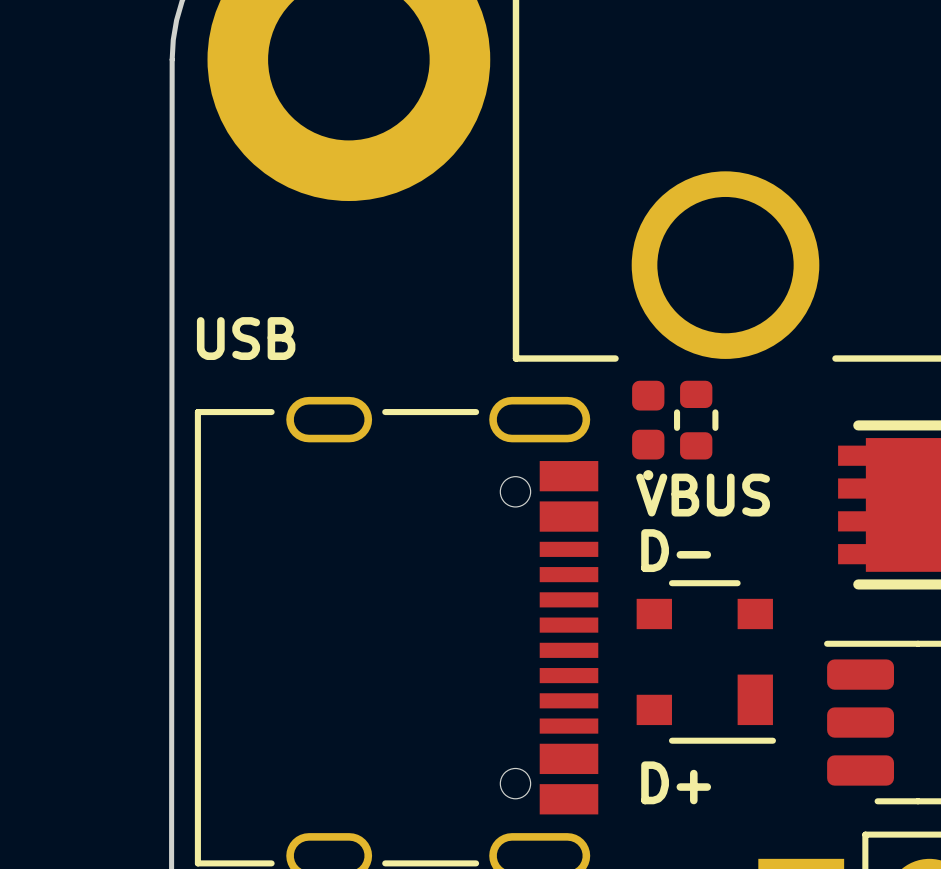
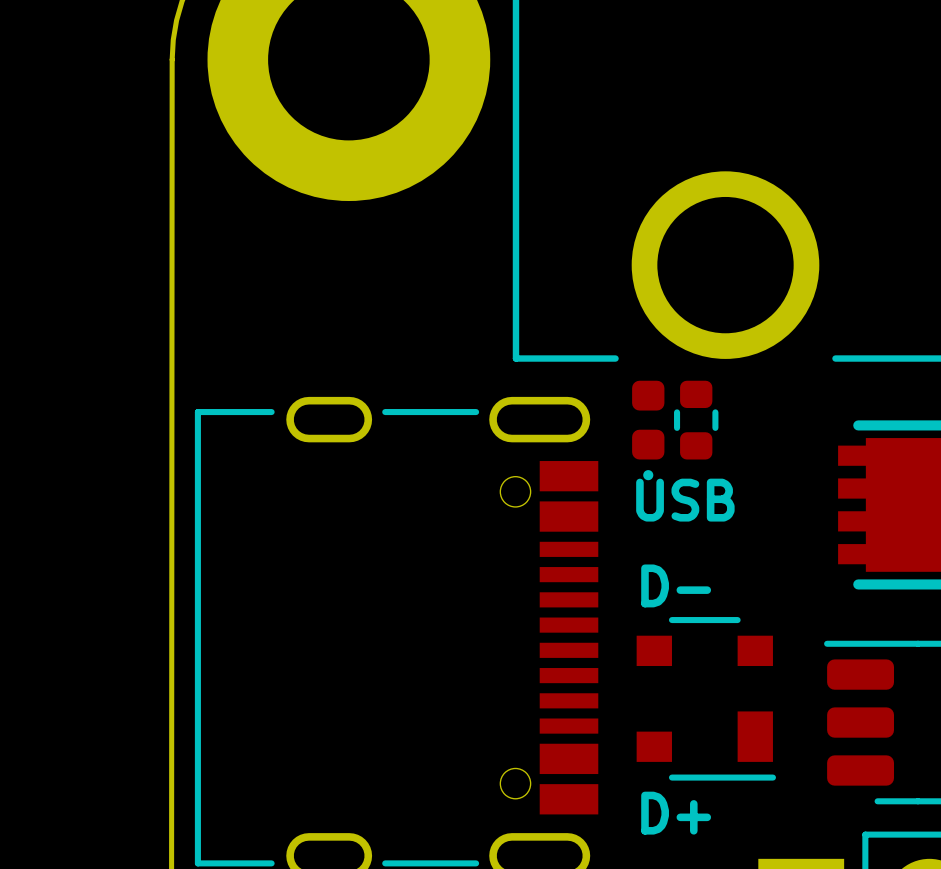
text position: USB (246, 338) -> USB (685, 500)
text: VBUS (703, 495) -> none
text position: D- (676, 550) -> D- (676, 585)
part position: (706, 661) -> (706, 698)
text position: D+ (676, 782) -> D+ (676, 813)

